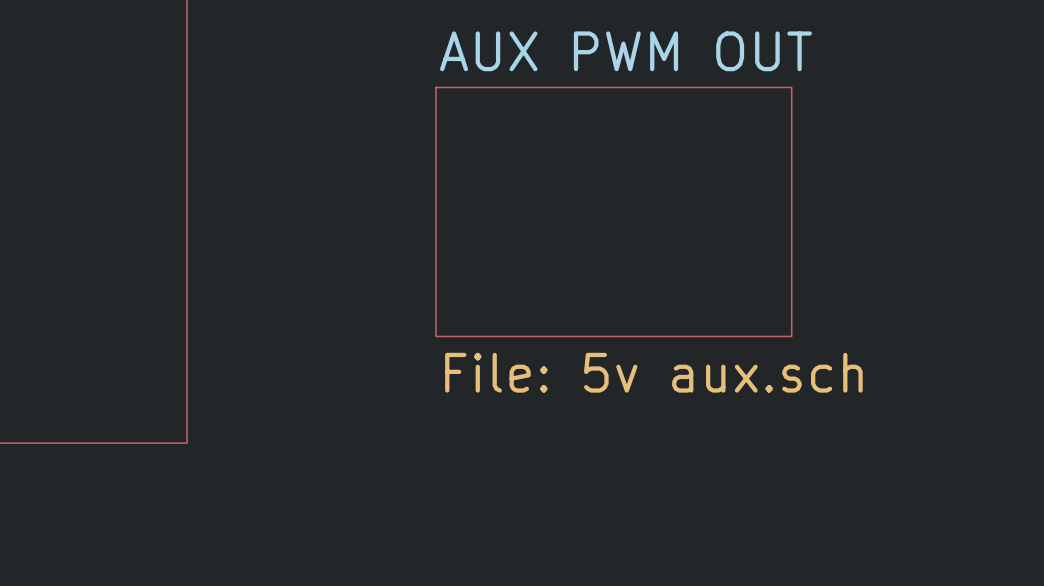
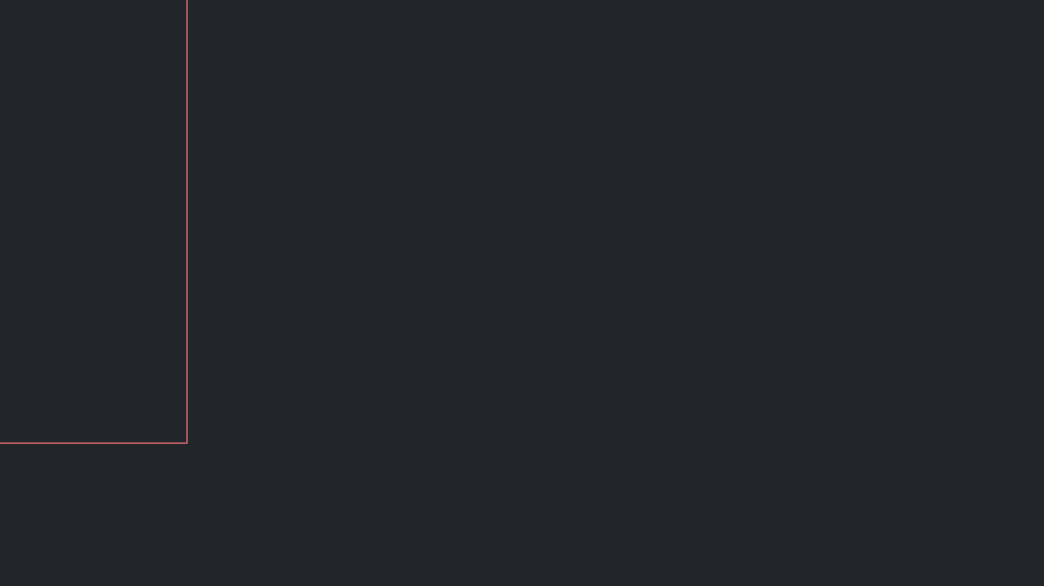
sheet AUX PWM OUT: File: 5v aux.sch (613, 211) -> none

